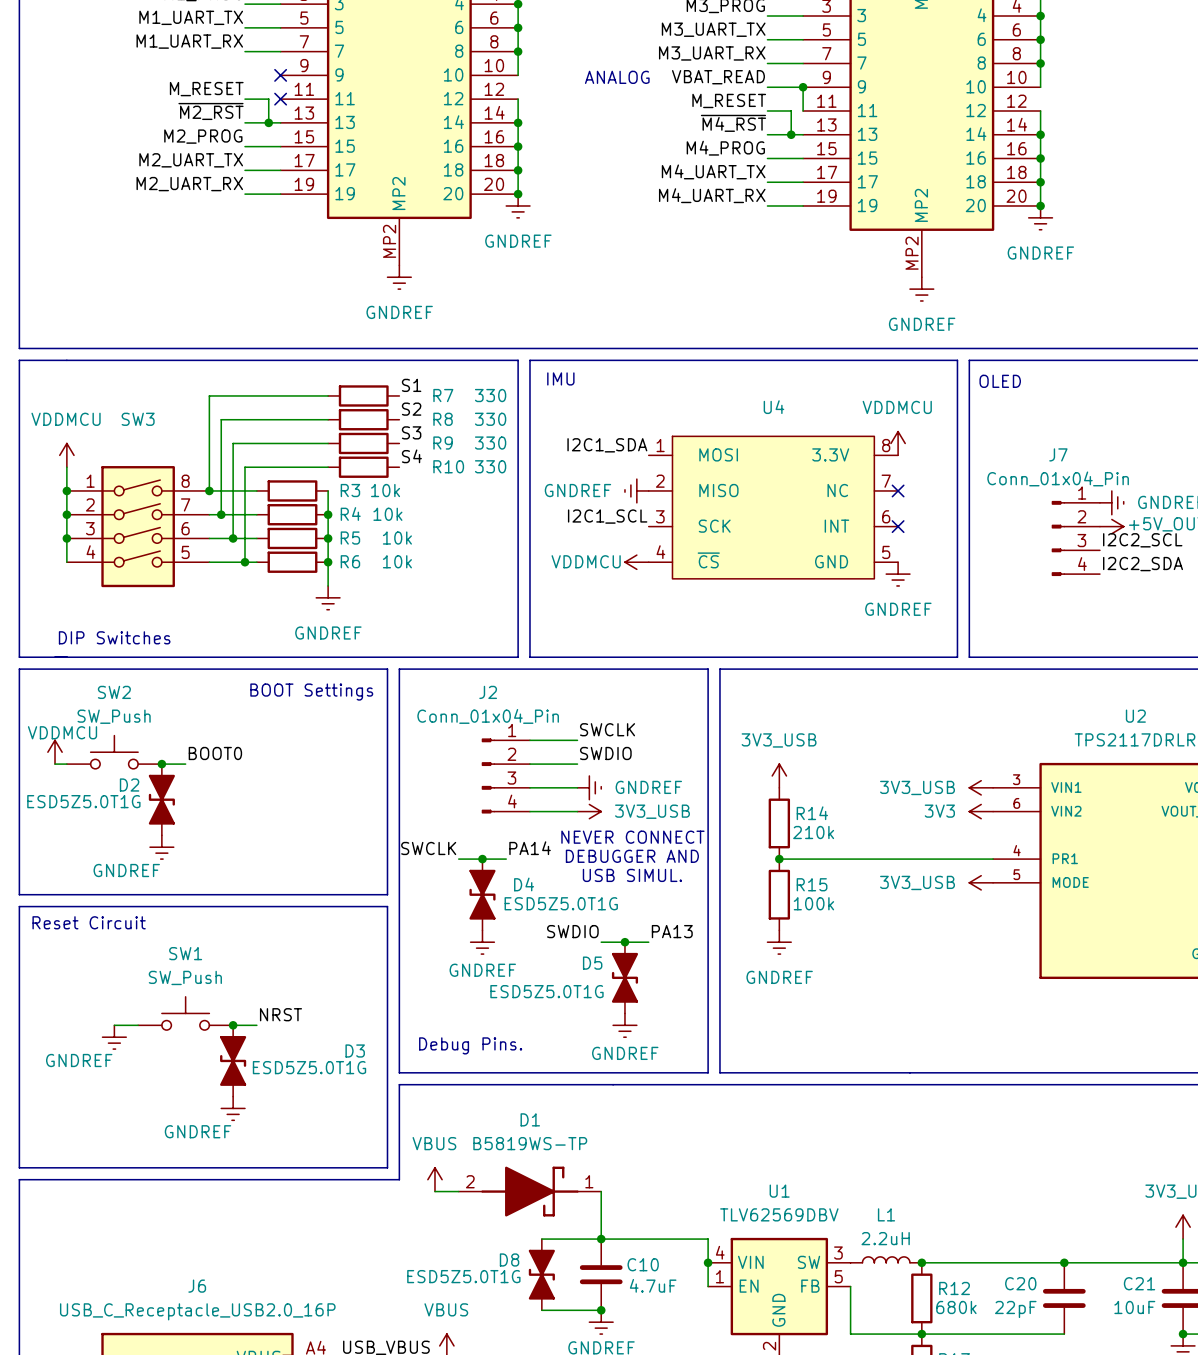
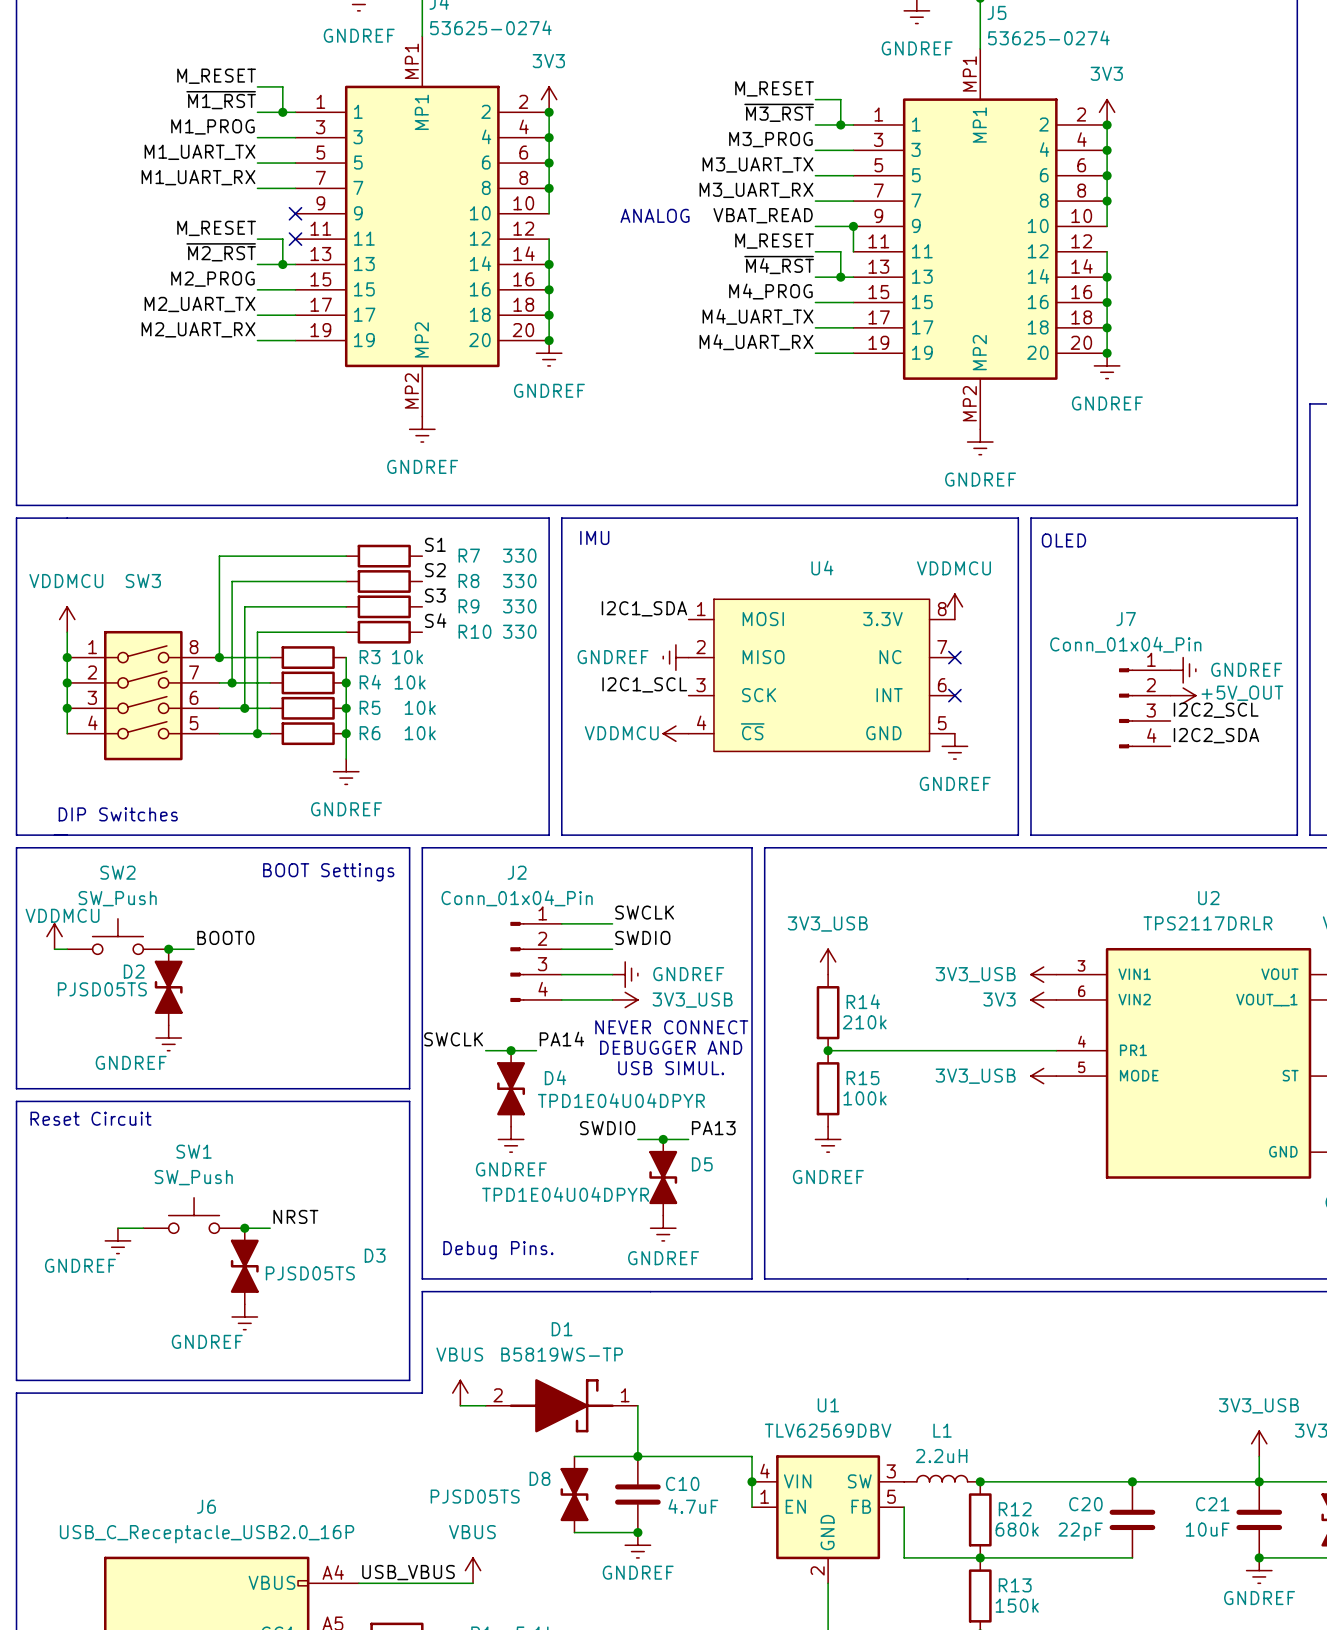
D2 value: ESD5Z5.0T1G (83, 801) -> PJSD05TS (102, 989)
D4 value: ESD5Z5.0T1G (561, 903) -> TPD1E04U04DPYR (621, 1100)
D5 name position: D5 (592, 963) -> D5 (702, 1164)
D5 value: ESD5Z5.0T1G (546, 991) -> TPD1E04U04DPYR (565, 1194)
D3 value: ESD5Z5.0T1G (309, 1067) -> PJSD05TS (310, 1273)
D8 value: ESD5Z5.0T1G (463, 1276) -> PJSD05TS (475, 1496)

